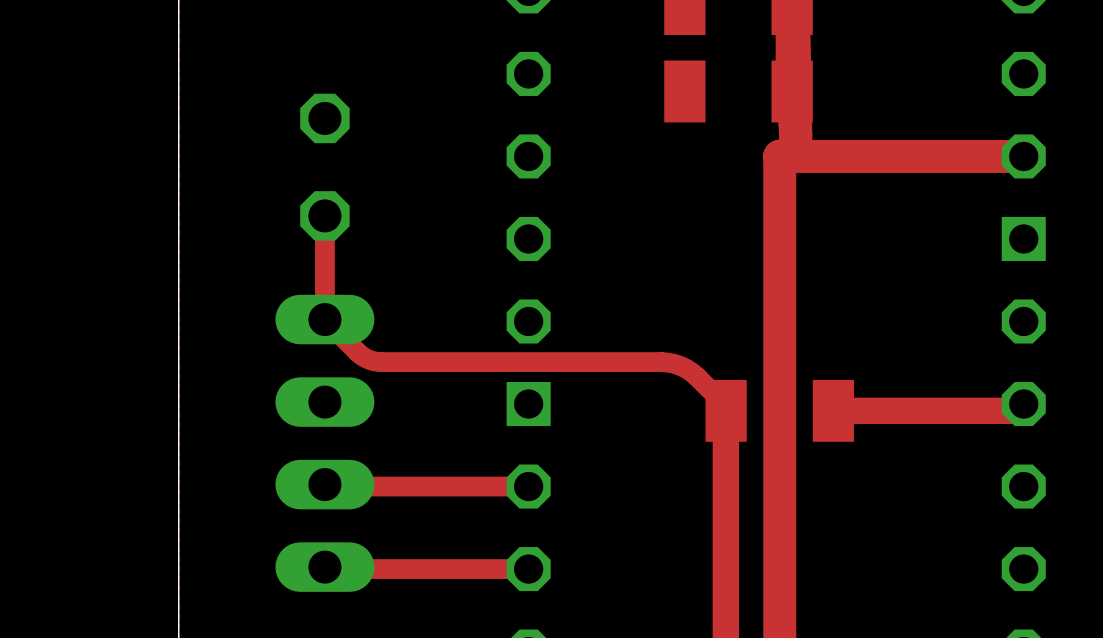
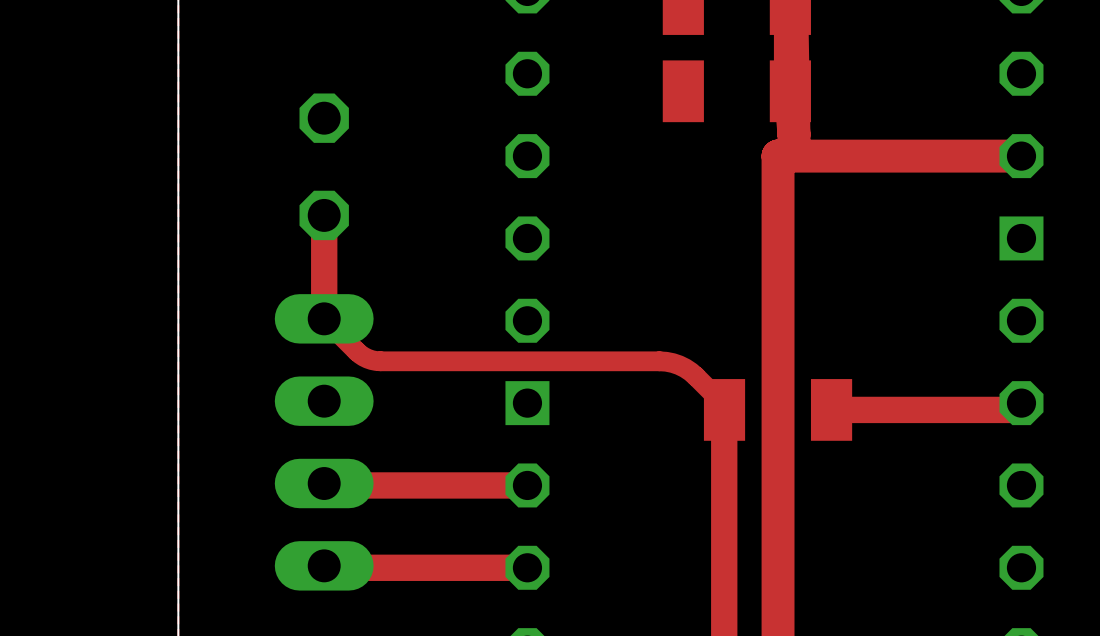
top track width: thin (324, 215) (324, 319) -> thick (324, 215) (324, 318)
top track width: thin (528, 486) (326, 486) -> thick (527, 485) (326, 485)
top track width: thin (528, 569) (326, 569) -> thick (527, 567) (326, 567)

